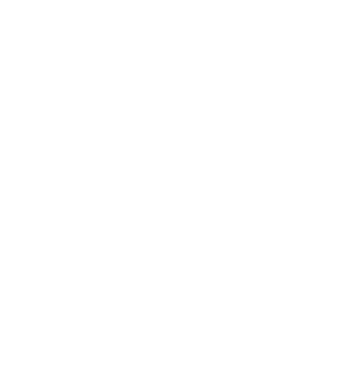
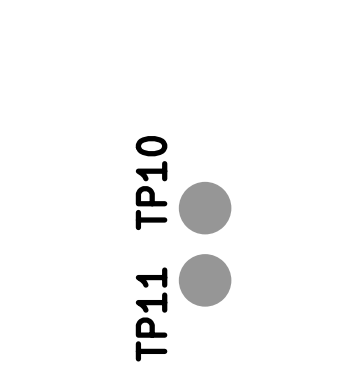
TP10: none -> (205, 208)
TP11: none -> (205, 280)

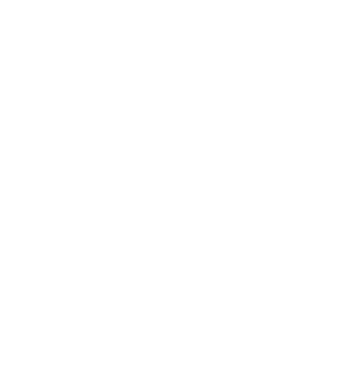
TP10: (205, 208) -> none
TP11: (205, 280) -> none

